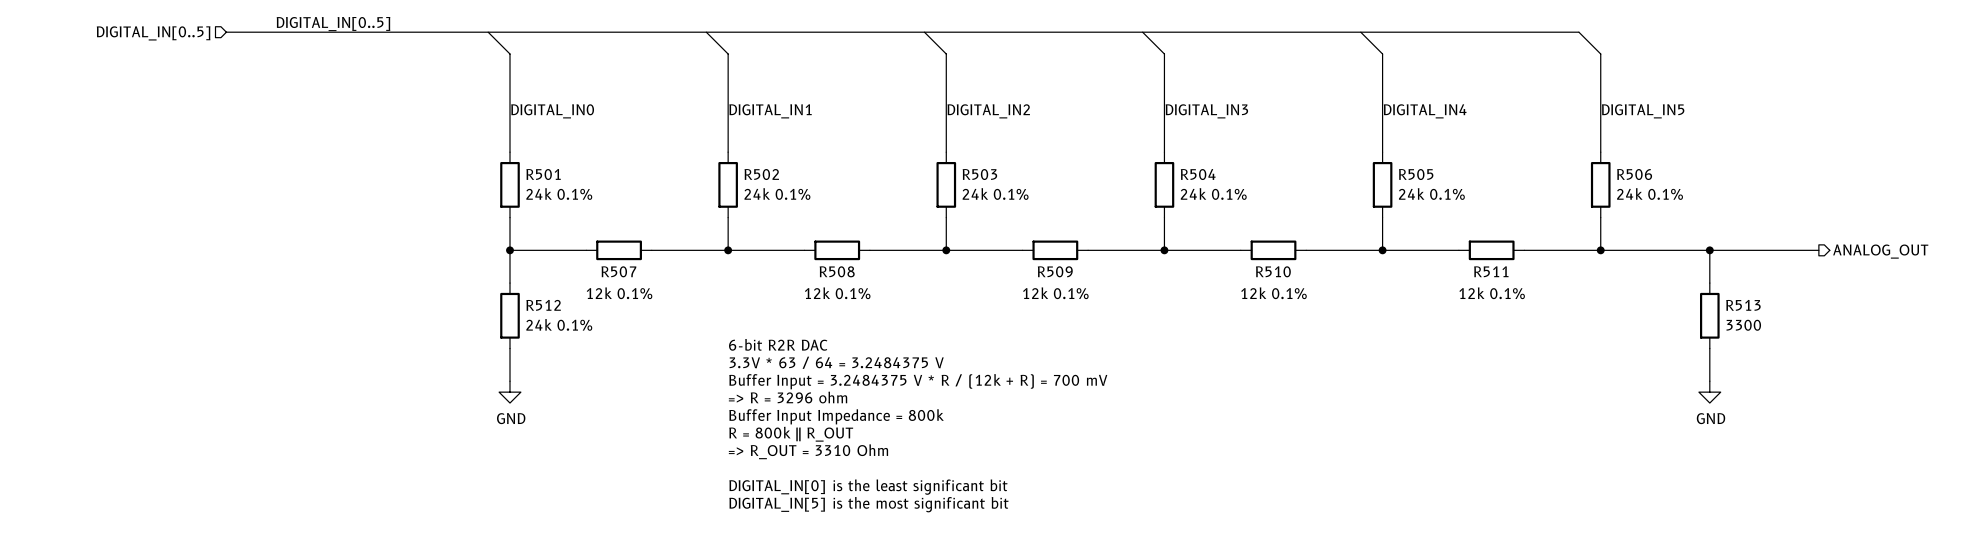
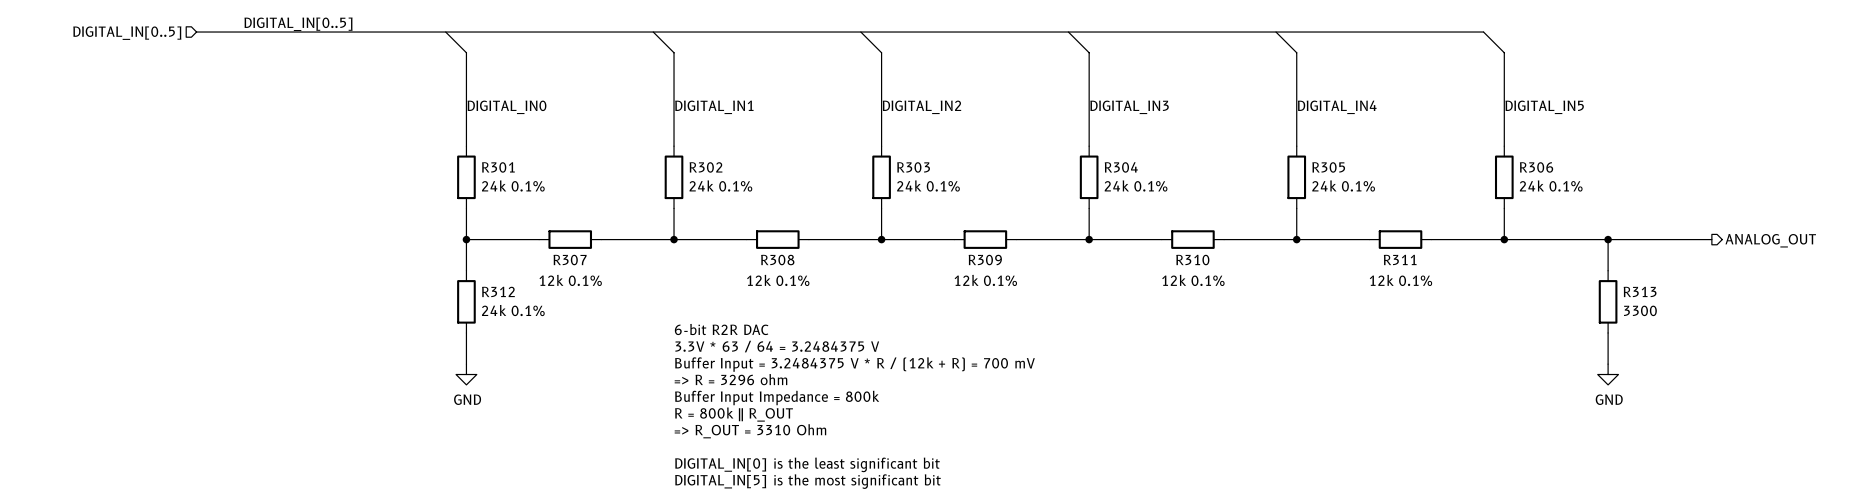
R501 name: R501 (543, 174) -> R301 (498, 167)
R502 name: R502 (761, 174) -> R302 (705, 167)
R503 name: R503 (979, 174) -> R303 (913, 167)
R504 name: R504 (1198, 174) -> R304 (1121, 167)
R505 name: R505 (1416, 174) -> R305 (1328, 167)
R506 name: R506 (1634, 174) -> R306 (1536, 167)
R507 name: R507 (618, 271) -> R307 (570, 260)
R508 name: R508 (837, 271) -> R308 (777, 260)
R509 name: R509 (1055, 271) -> R309 (985, 260)
R510 name: R510 (1273, 271) -> R310 (1192, 260)
R511 name: R511 (1491, 271) -> R311 (1400, 259)
R512 name: R512 (543, 305) -> R312 (498, 291)
R513 name: R513 (1743, 305) -> R313 (1640, 291)

